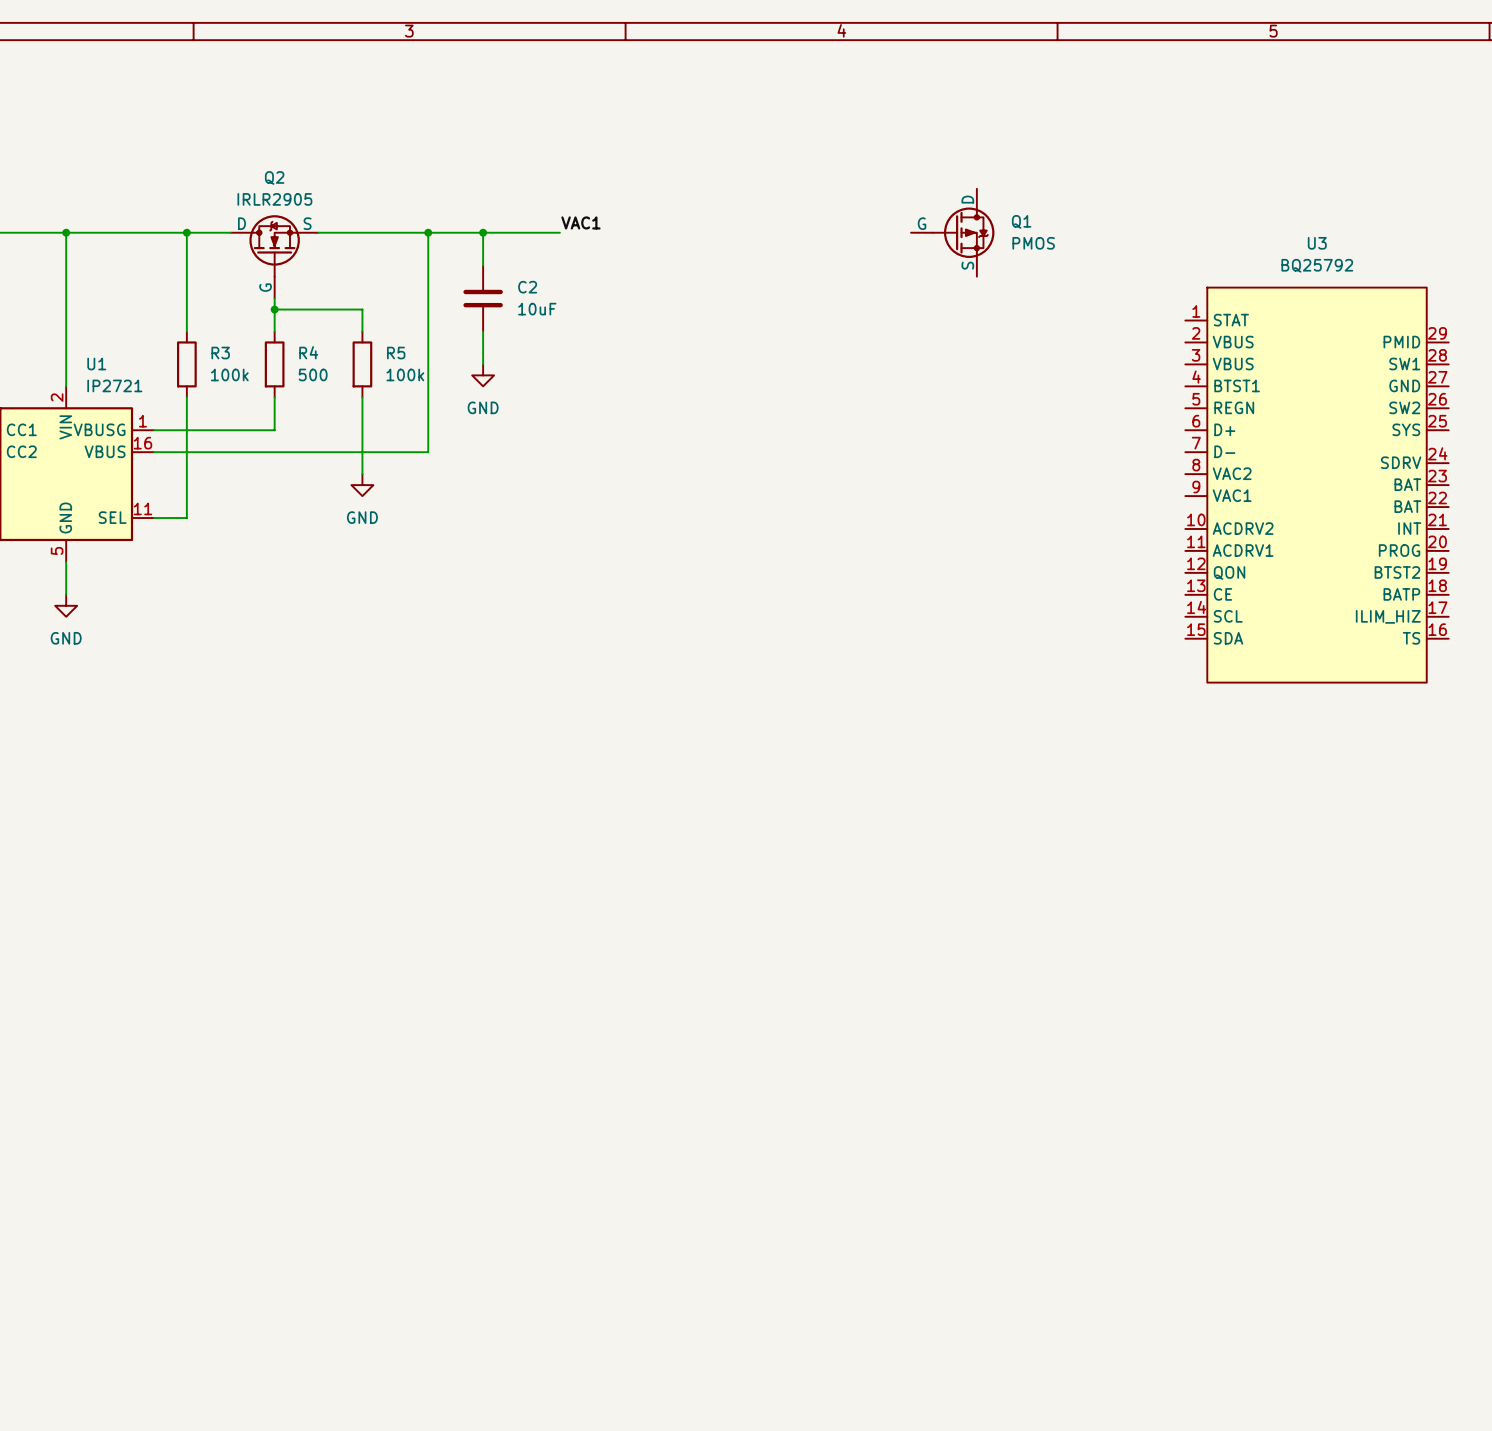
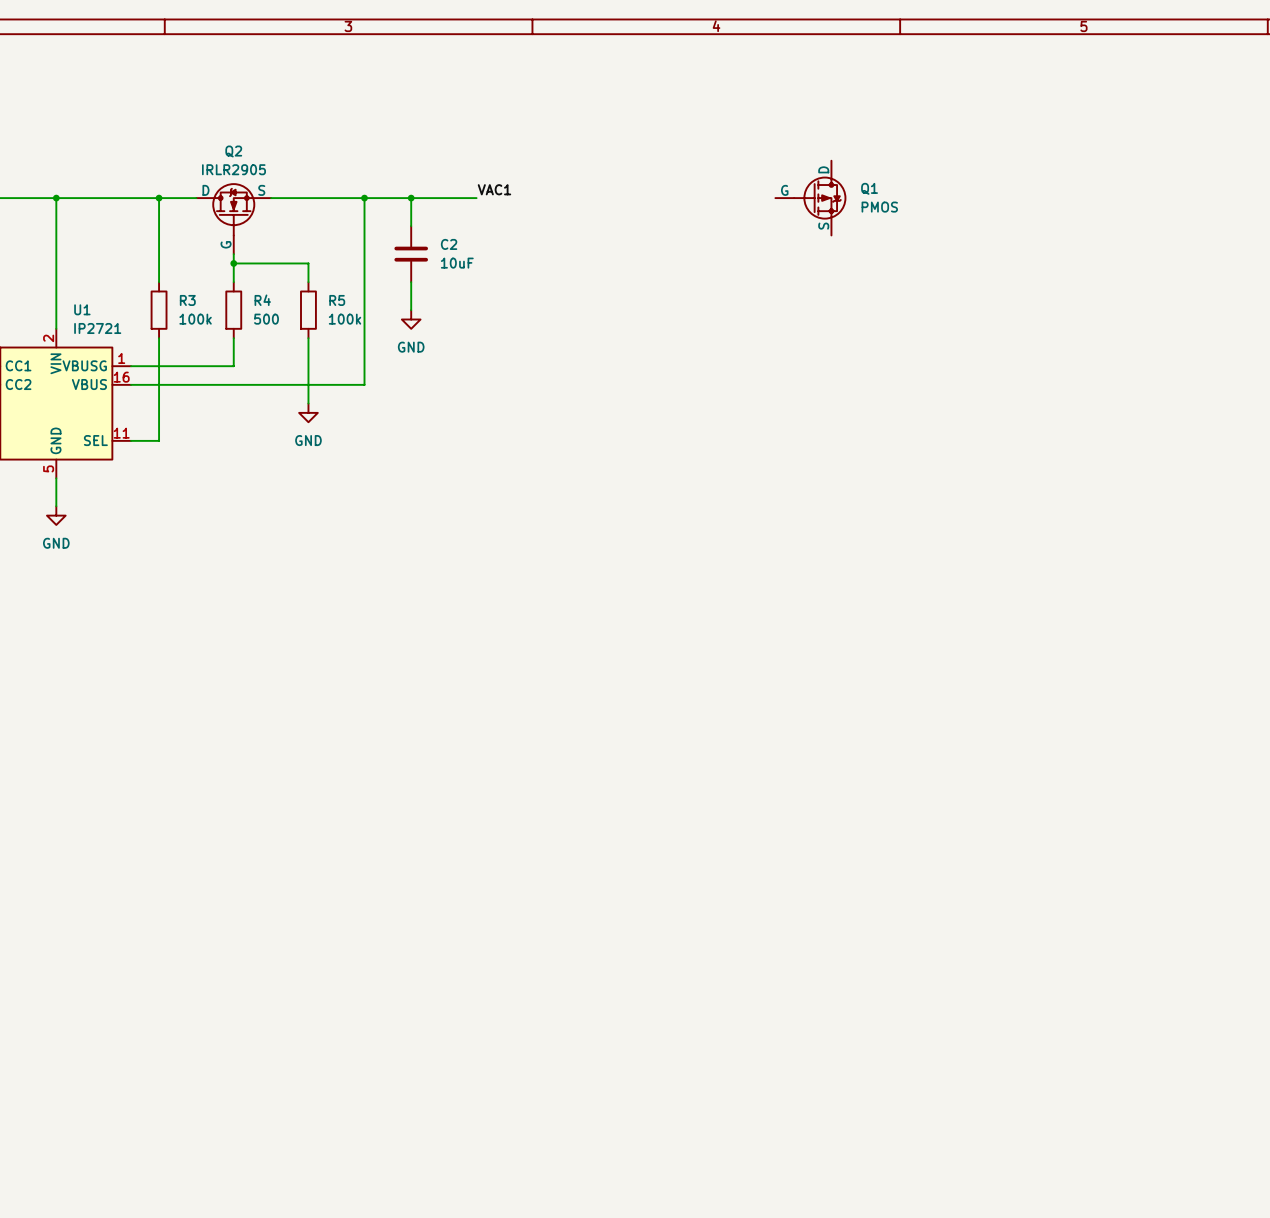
U3: BQ25792 (1317, 485) -> none

